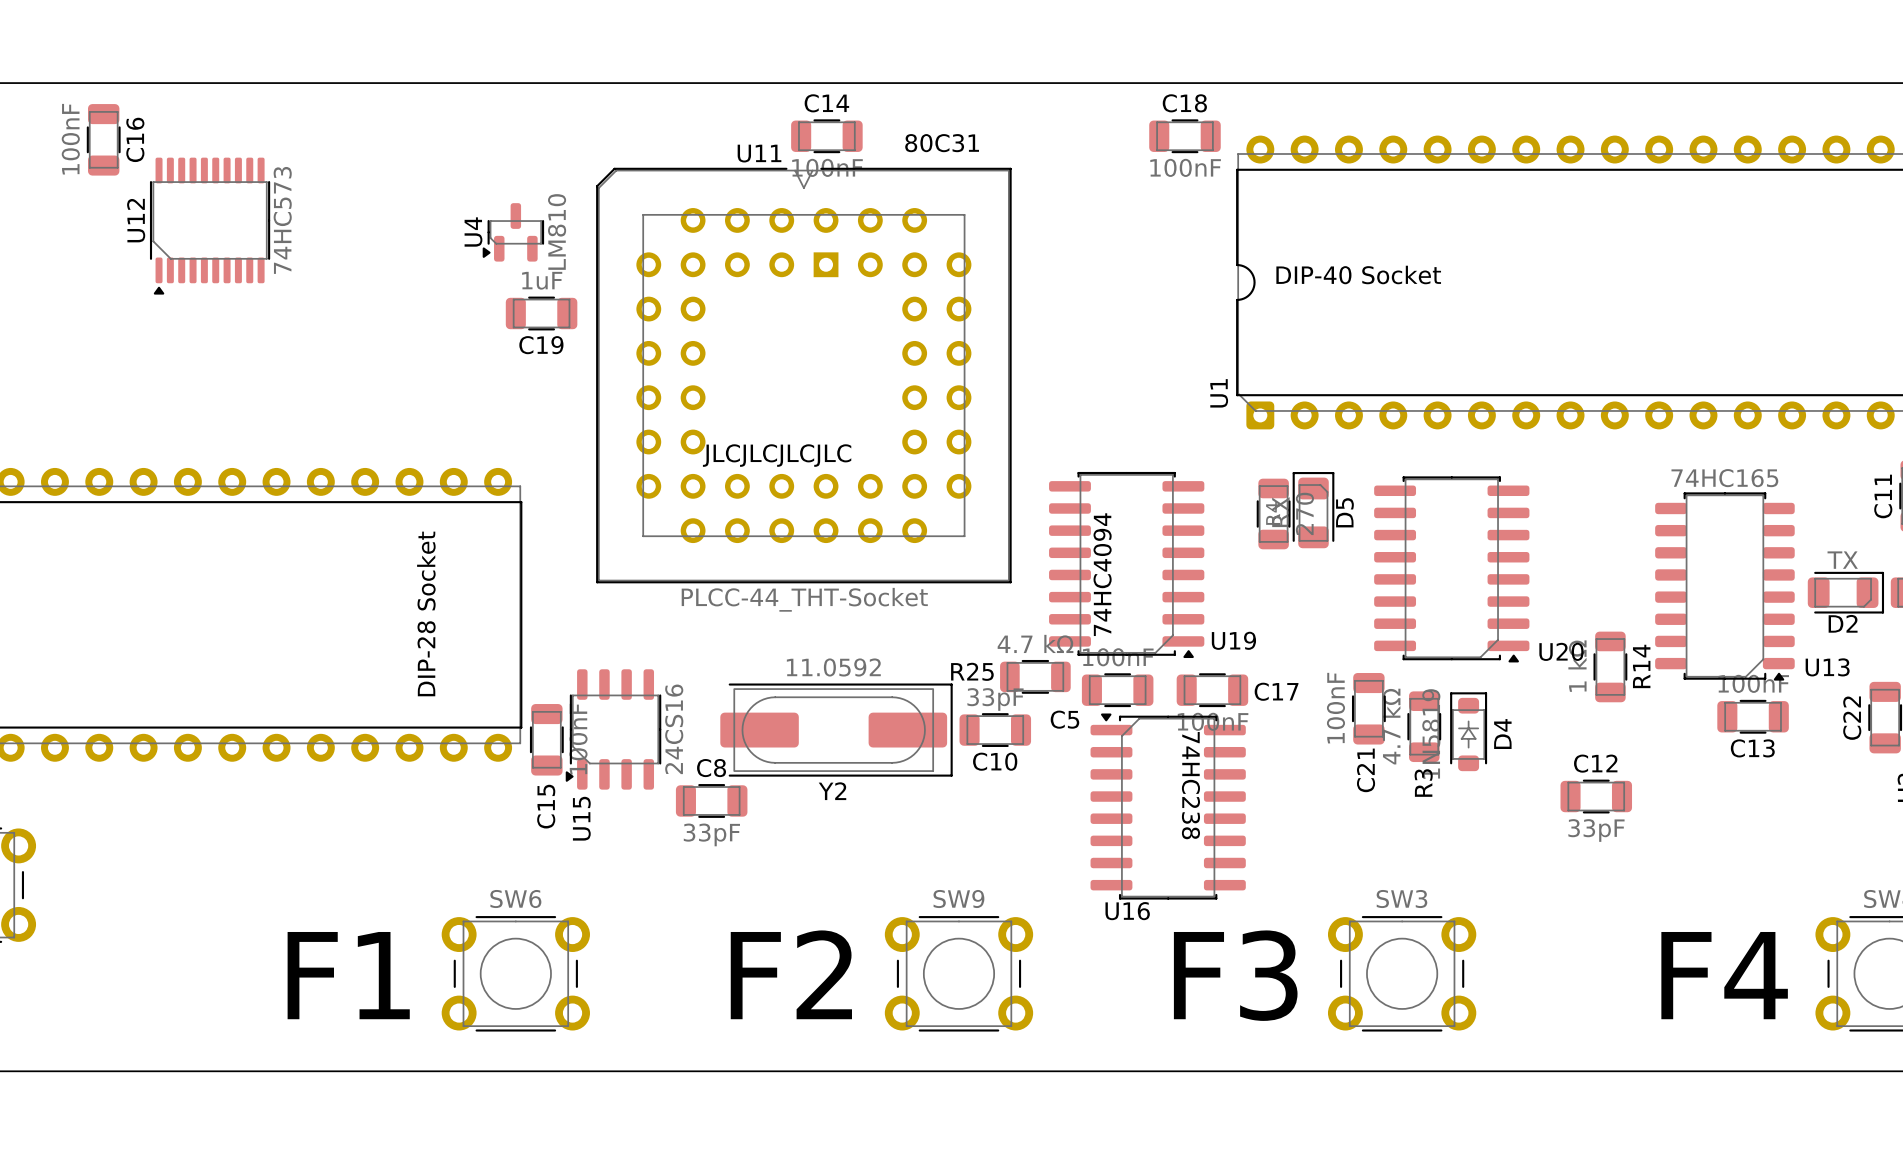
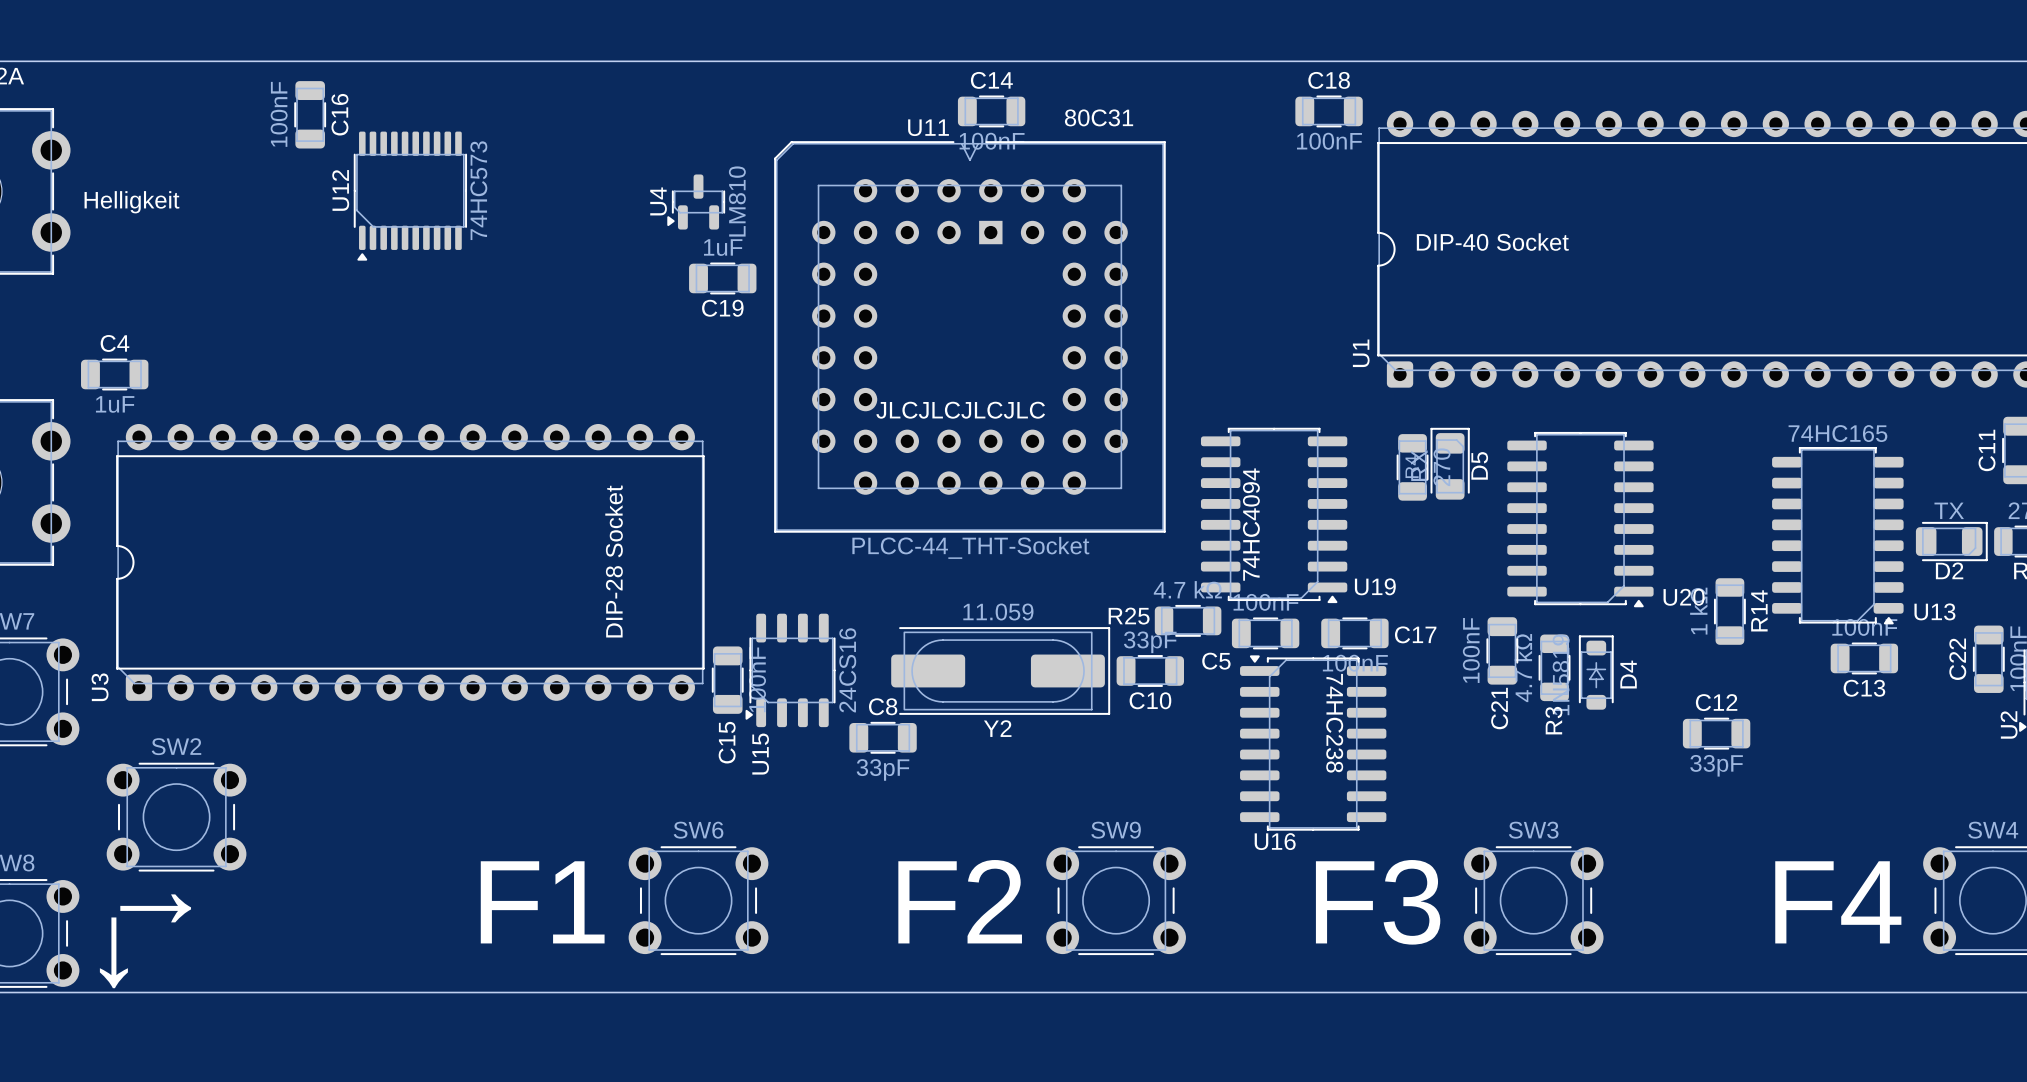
Y2 value: 11.0592 (833, 667) -> 11.059 (998, 612)

